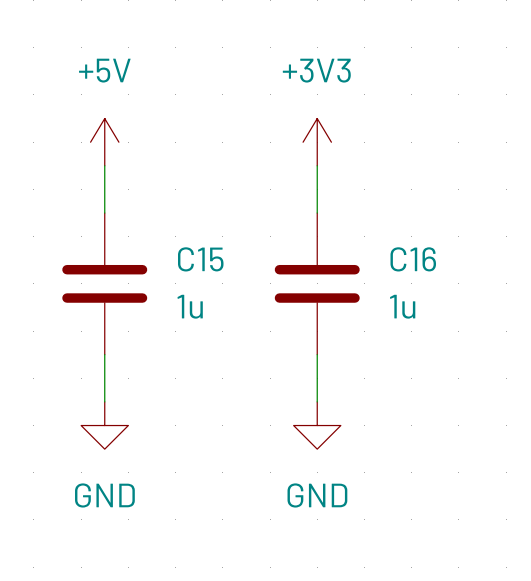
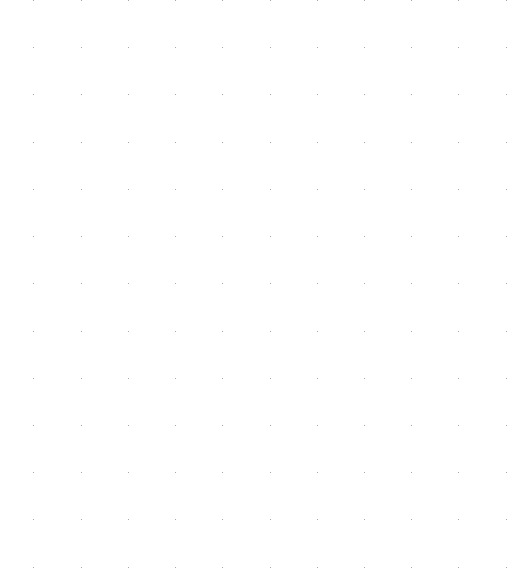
power symbol: +5V (104, 142) -> none
power symbol: +3V3 (317, 142) -> none
wire: (104, 165) (104, 213) -> none
wire: (317, 165) (317, 213) -> none
C15: 1u (104, 283) -> none
C16: 1u (317, 283) -> none
wire: (104, 354) (104, 401) -> none
wire: (317, 354) (317, 401) -> none
power symbol: GND (104, 425) -> none
power symbol: GND (317, 425) -> none

